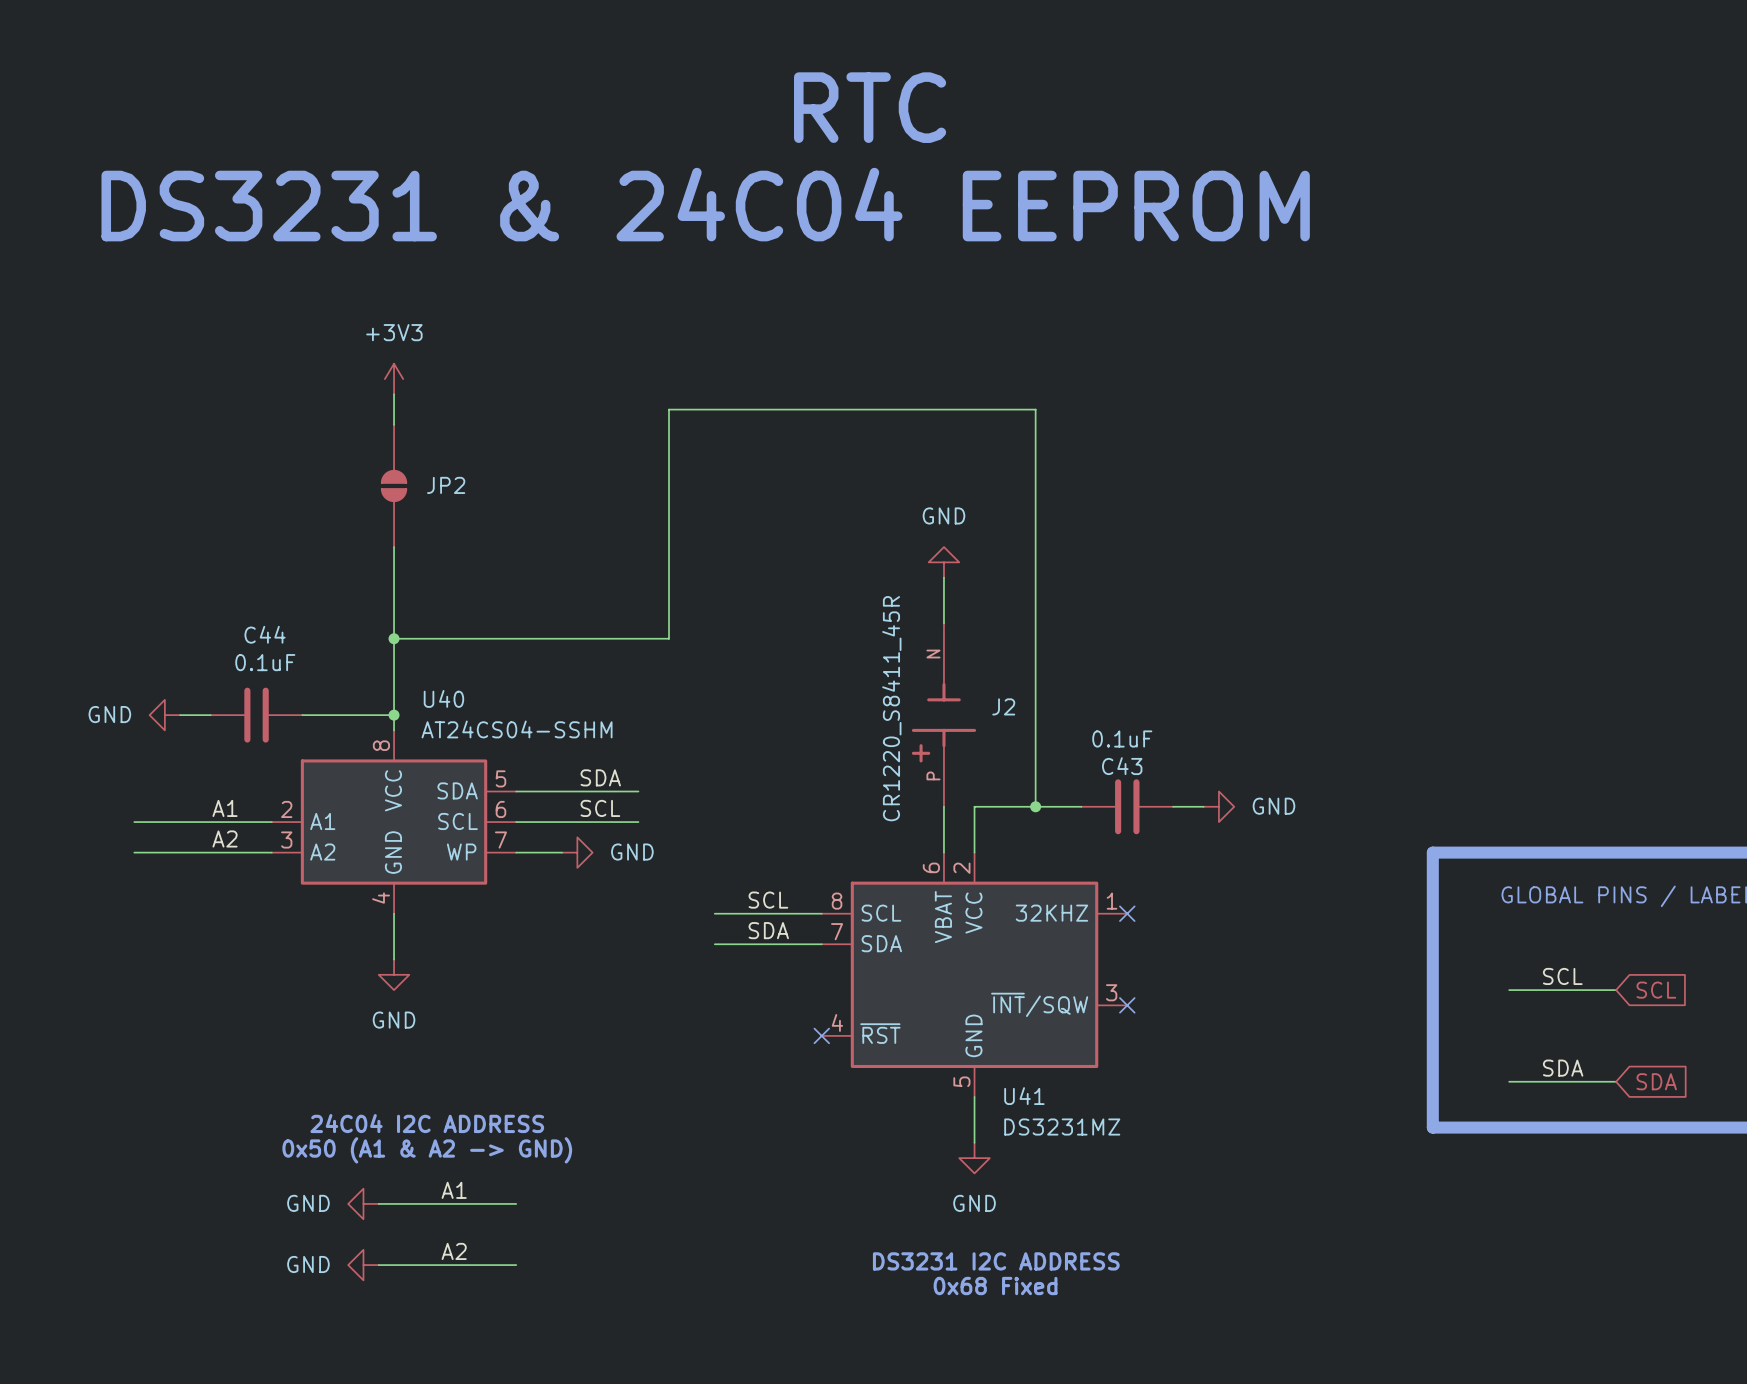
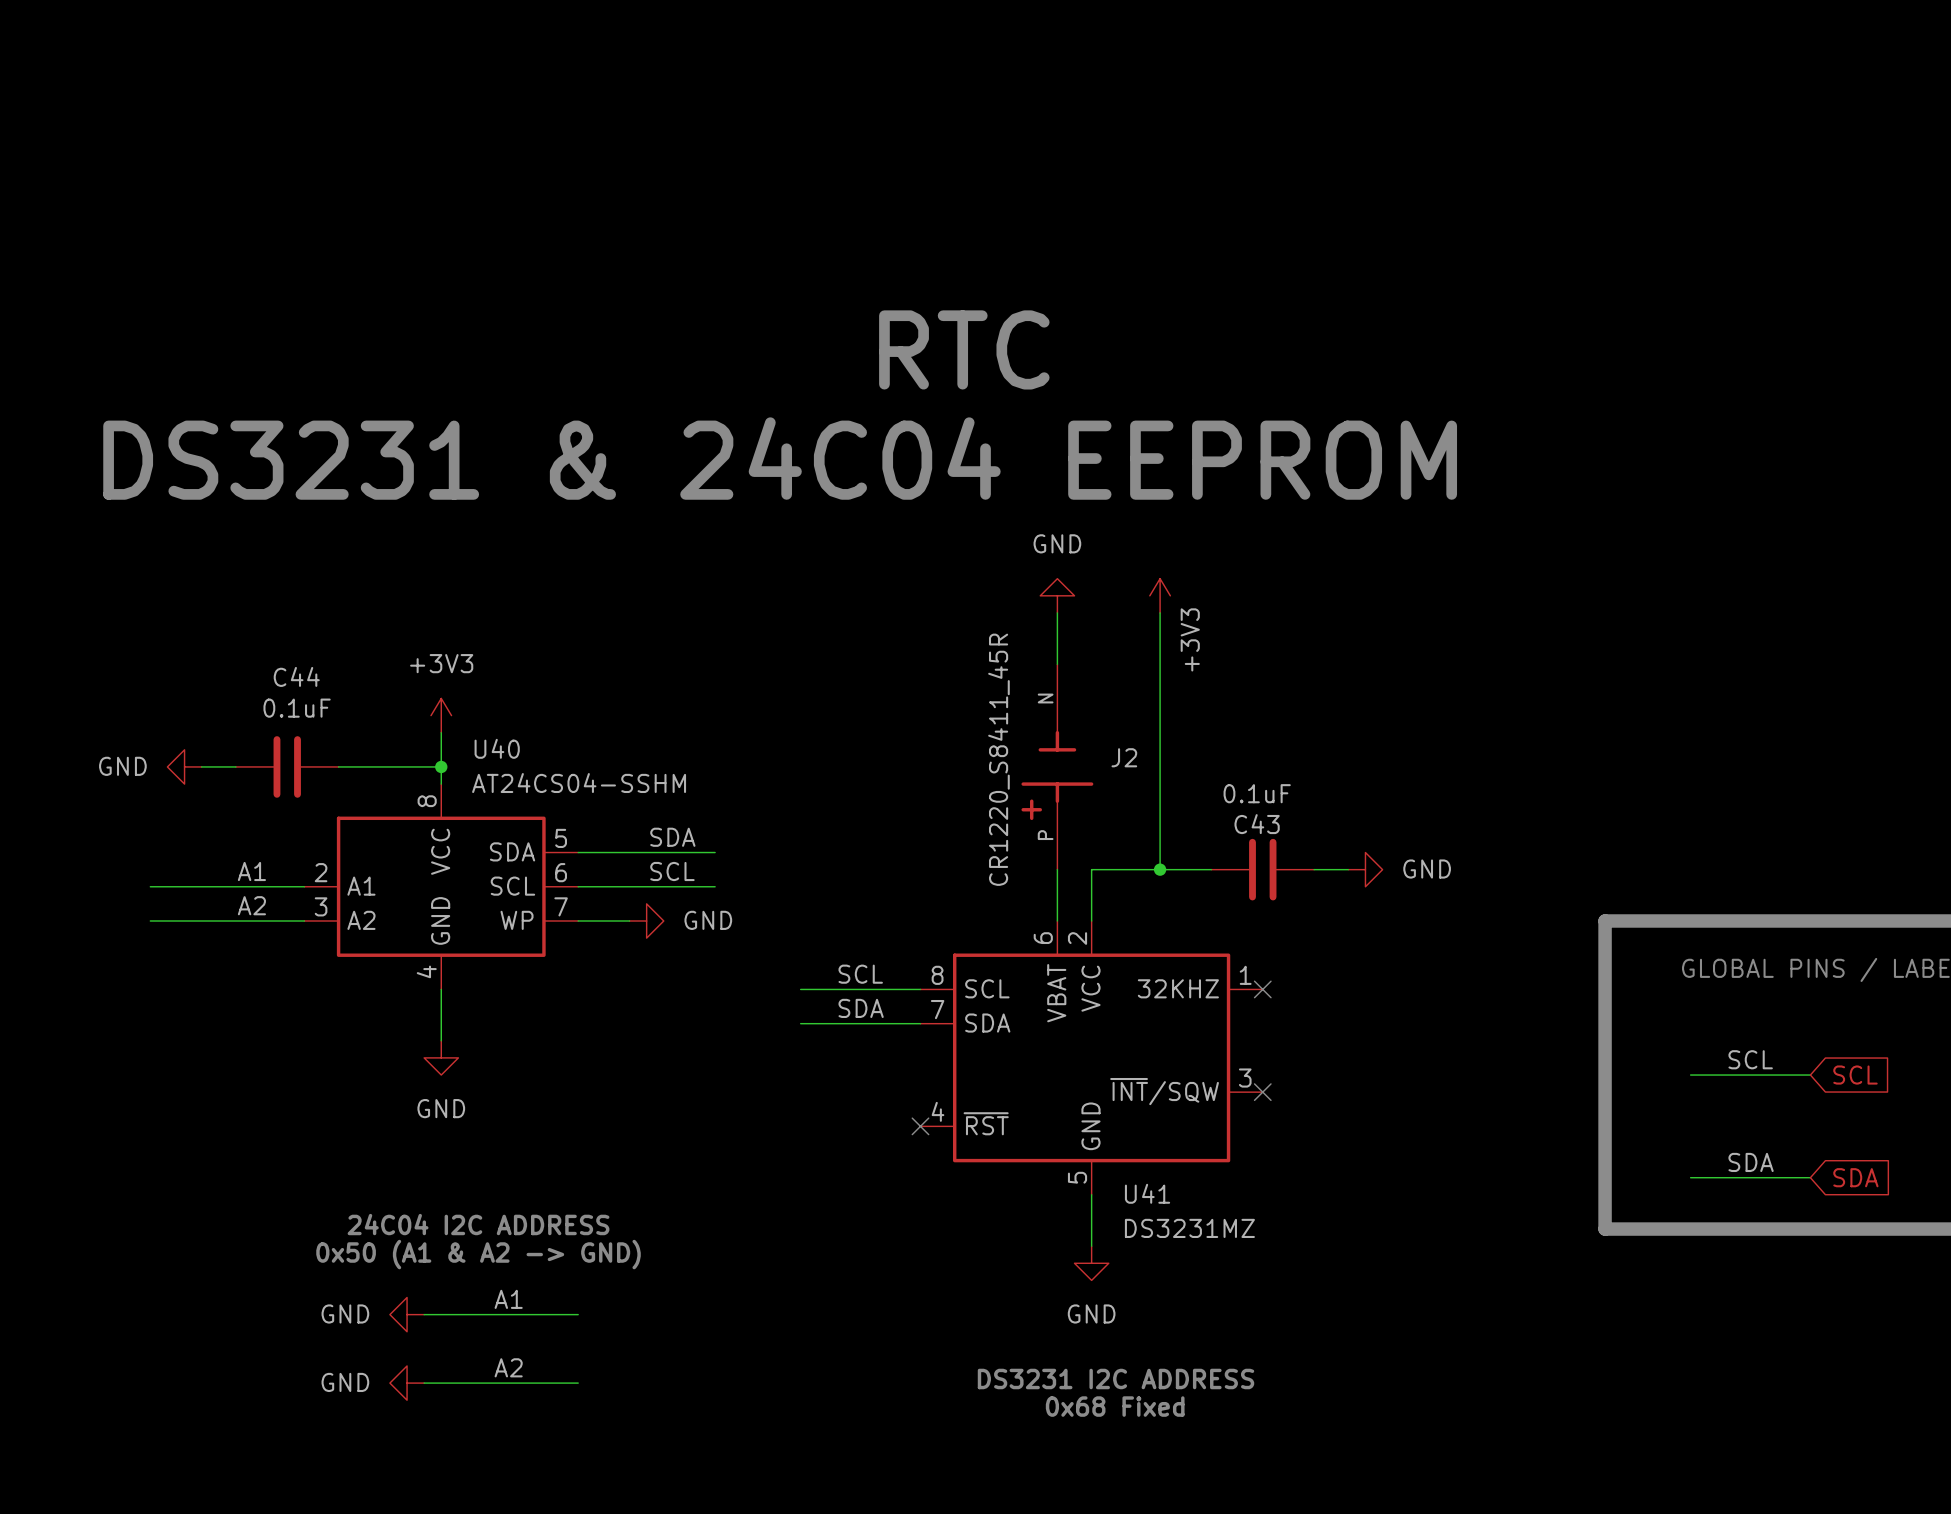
text position: RTC (870, 107) -> RTC (964, 349)
text position: DS3231 & 24C04 EEPROM (705, 204) -> DS3231 & 24C04 EEPROM (780, 458)
power symbol position: +3V3 (394, 379) -> +3V3 (441, 715)
wire: (394, 394) (394, 424) -> none
JP2: (394, 485) -> none
wire: (394, 547) (394, 684) -> none
power symbol: none -> +3V3 (1160, 595)
wire: (1035, 577) (1035, 409) (669, 409) (669, 638) (394, 638) -> none
junction: (394, 638) -> none

